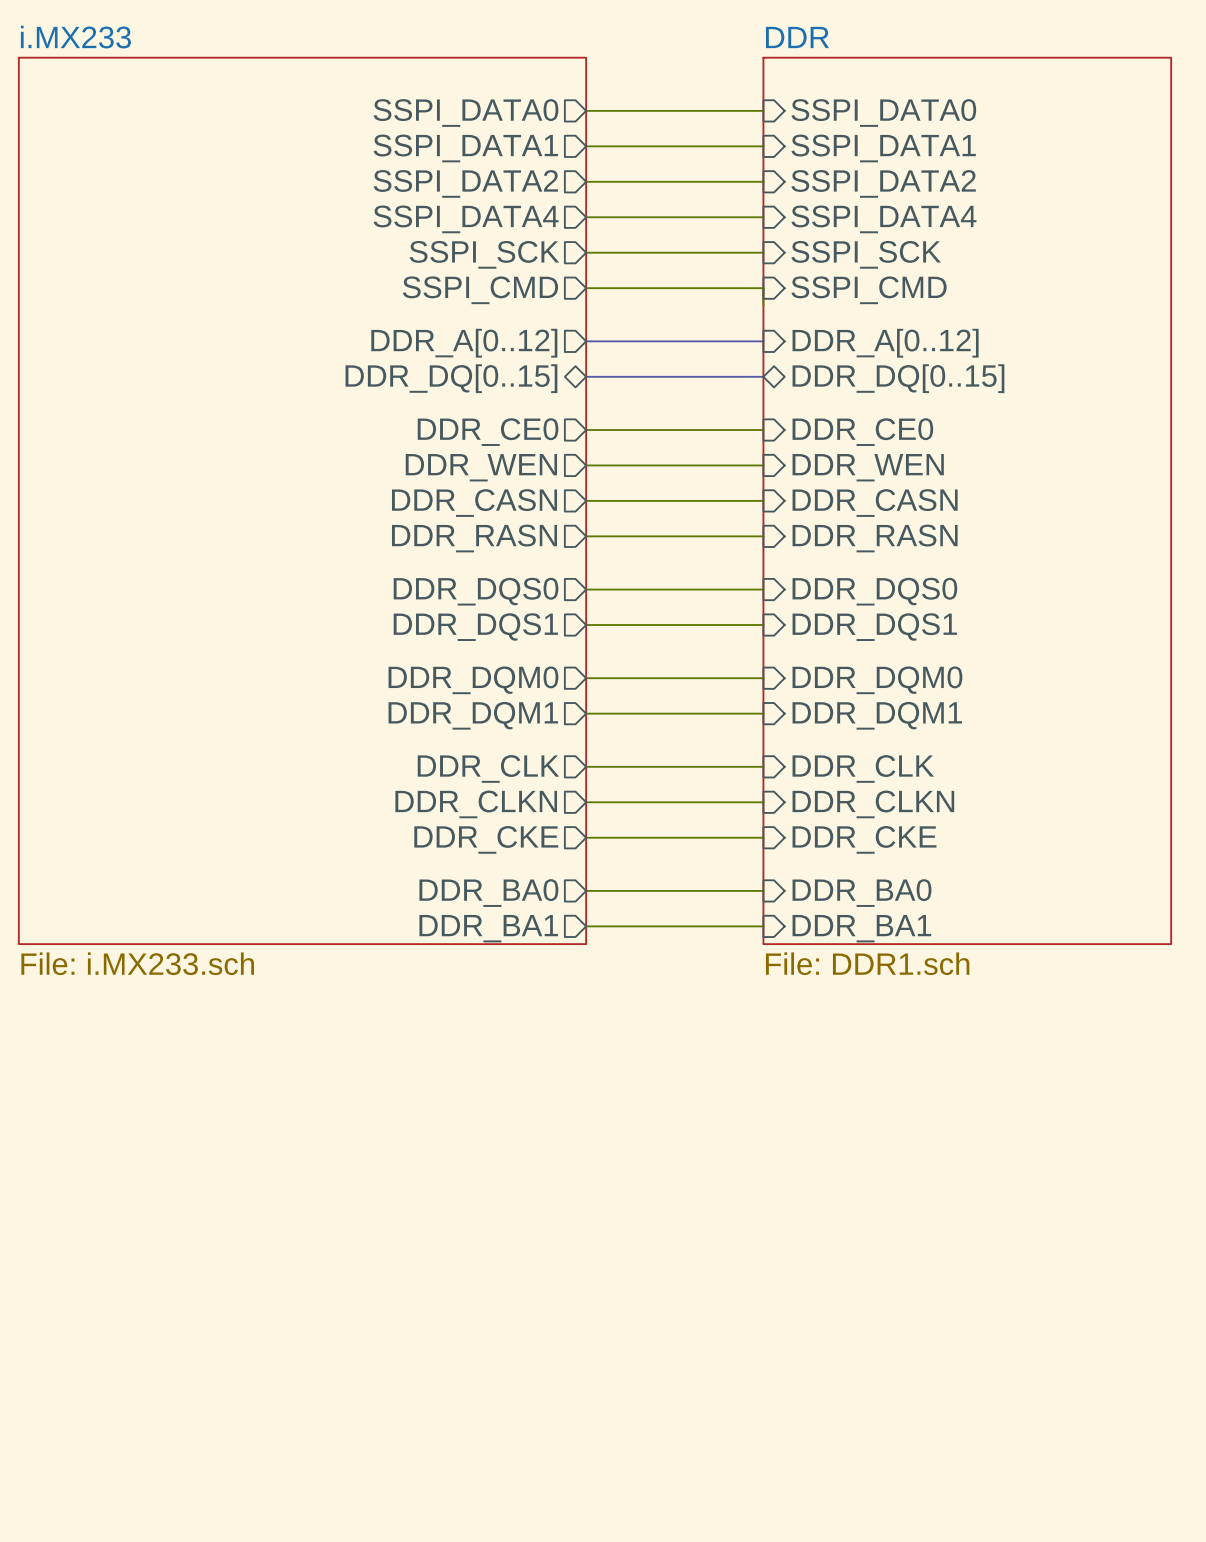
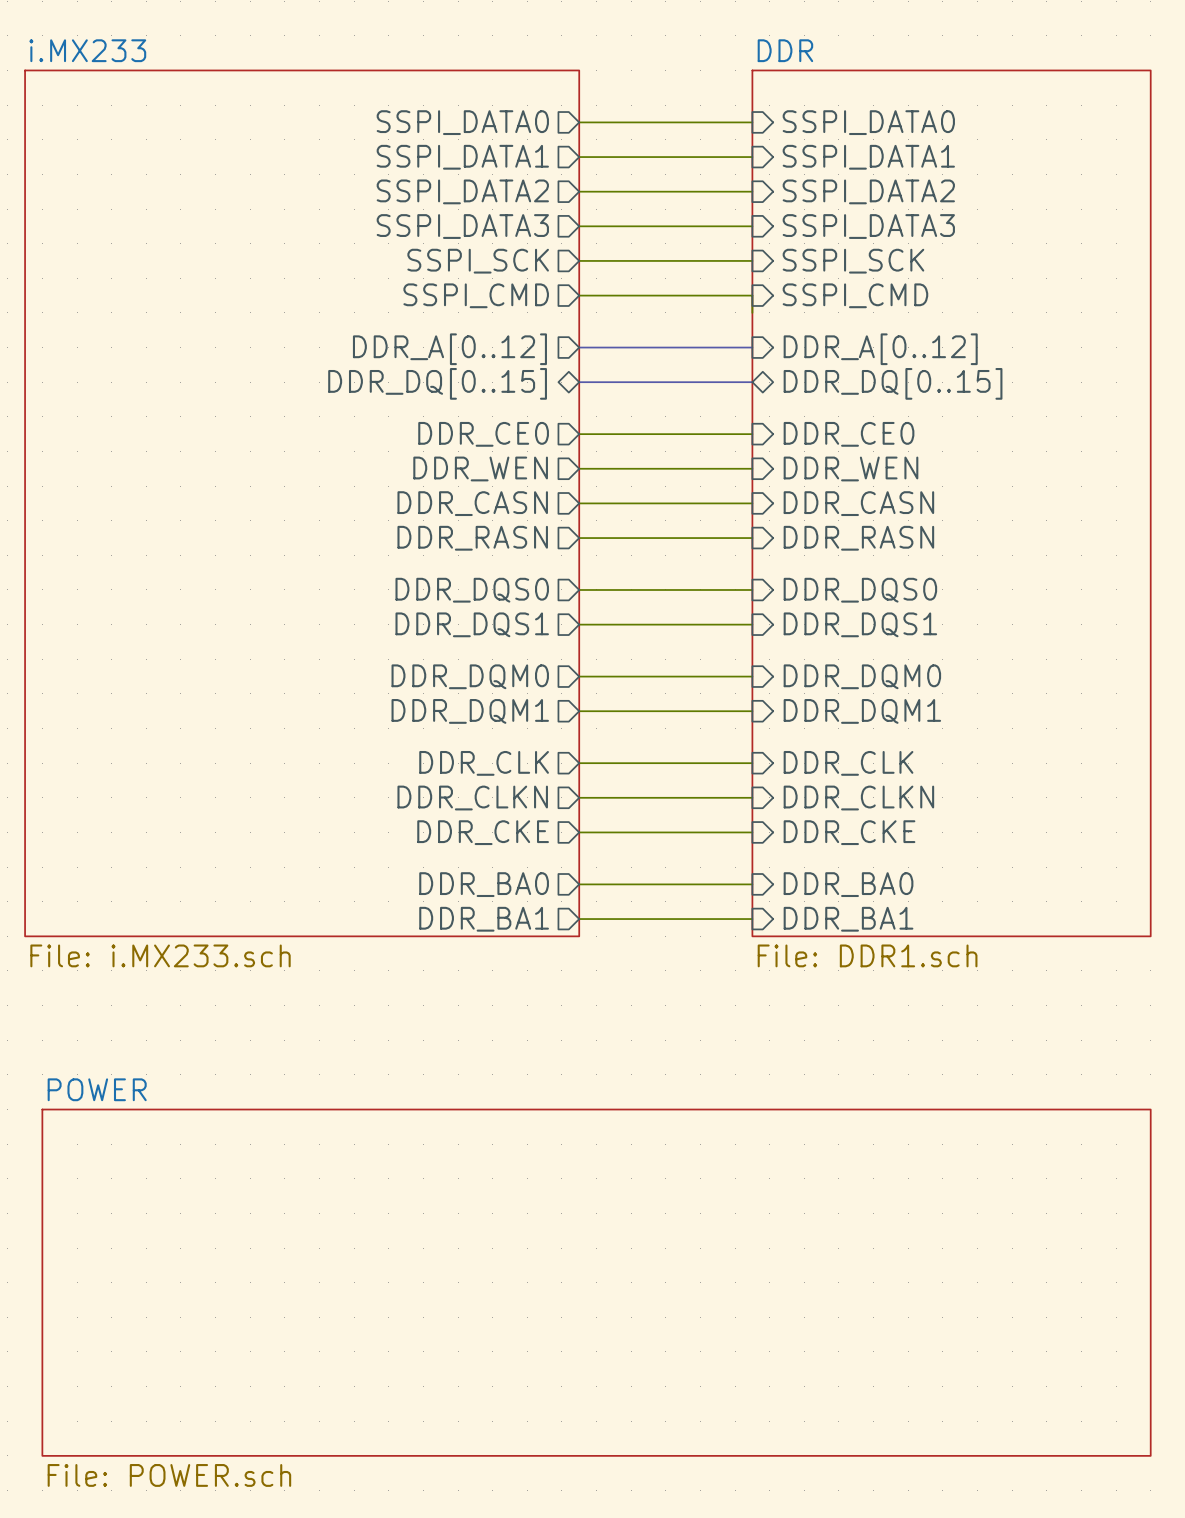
sheet pin: SSPI_DATA4 (466, 219) -> SSPI_DATA3 (462, 226)
sheet pin: SSPI_DATA4 (883, 219) -> SSPI_DATA3 (868, 226)
sheet POWER: none -> File: POWER.sch (596, 1282)

